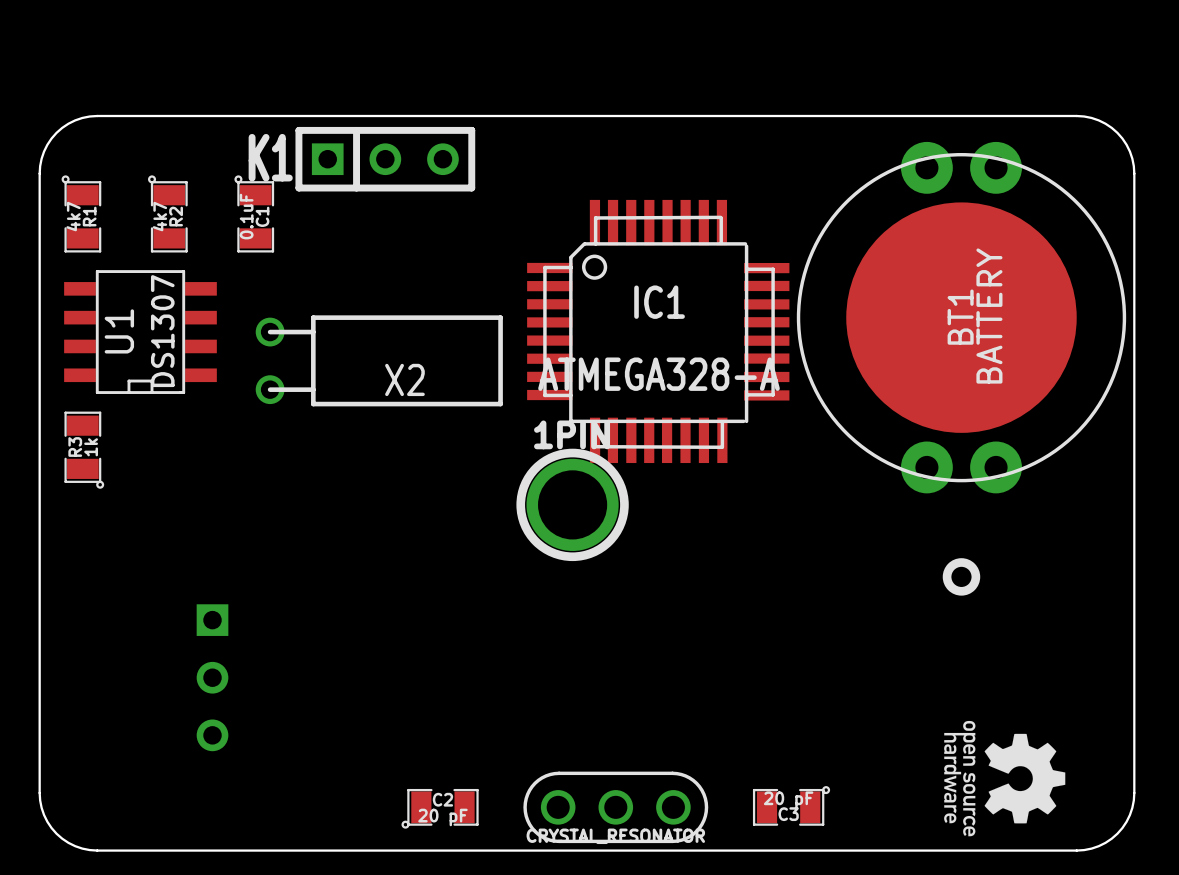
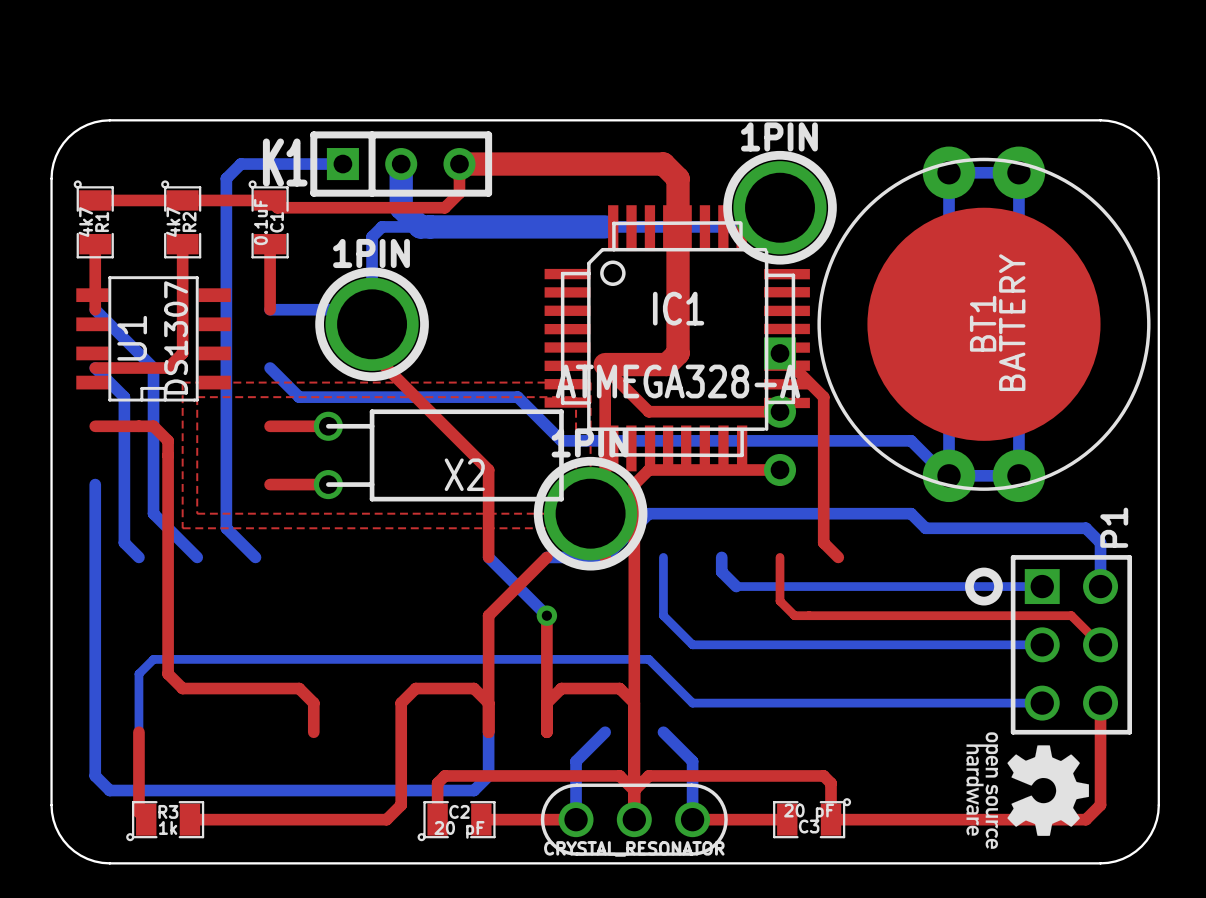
bottom track: none -> (342, 164) (240, 164) (226, 178) (226, 528) (255, 557)
bottom track: none -> (401, 164) (401, 207) (420, 226) (760, 226) (780, 207)
top track: none -> (95, 200) (270, 200) (277, 207) (444, 207) (459, 193) (459, 164) (663, 164) (678, 178) (678, 353) (666, 364) (605, 364) (605, 557)
1PIN: none -> (780, 207)
bottom track: none -> (430, 226) (382, 226) (372, 236) (372, 324) (357, 309) (270, 309)
top track: none -> (95, 244) (95, 309)
top track: none -> (182, 244) (182, 353) (168, 368) (95, 368)
top track: none -> (270, 244) (270, 309)
bottom track: none -> (95, 309) (153, 368) (153, 513) (197, 557)
top track: none -> (372, 324) (372, 353) (488, 469) (488, 557)
1PIN: none -> (372, 324)
top track: none -> (780, 353) (823, 397) (823, 542) (838, 557)
bottom track: none -> (95, 368) (124, 397) (124, 542) (138, 557)
bottom track: none -> (270, 368) (299, 397) (517, 397) (561, 440) (911, 440) (946, 475) (1018, 475) (1018, 172) (949, 172) (949, 475)
X2 position: (379, 360) -> (438, 455)
top track: none -> (605, 368) (648, 411) (780, 411)
top zone outline: none -> (182, 382) (590, 382) (590, 528) (182, 528) (182, 382)
top zone outline: none -> (197, 397) (197, 513) (576, 513) (576, 397) (197, 397)
part: none -> (780, 411)
top track: none -> (95, 426) (153, 426) (168, 440) (168, 673) (182, 688) (299, 688) (313, 703) (313, 732)
top track: none -> (270, 426) (328, 426)
R3 rotation: 0° (84, 450) -> 90° clockwise (165, 821)
R3 position: (84, 450) -> (165, 821)
top track: none -> (780, 469) (648, 469) (634, 484) (634, 819)
bottom track: none -> (95, 484) (95, 775) (109, 790) (474, 790) (488, 775) (488, 732)
top track: none -> (270, 484) (328, 484)
bottom track: none -> (488, 557) (546, 615)
bottom track: none -> (546, 557) (605, 557) (648, 513) (911, 513) (925, 528) (1085, 528) (1100, 542) (1100, 586)
top track: none -> (546, 557) (488, 615) (488, 732)
bottom track: none -> (663, 557) (663, 615) (692, 644) (1042, 644)
bottom track: none -> (721, 557) (721, 571) (736, 586) (1042, 586)
top track: none -> (780, 557) (780, 601) (794, 615) (1071, 615) (1100, 644)
top track: none -> (546, 615) (546, 732)
via: none -> (546, 615)
P1: none -> (1071, 644)
part: (212, 677) -> none
top track: none -> (488, 703) (474, 688) (415, 688) (401, 703) (401, 805) (386, 819) (189, 819)
top track: none -> (546, 703) (561, 688) (619, 688) (634, 703)
bottom track: none -> (1042, 703) (692, 703) (648, 659) (153, 659) (138, 673) (138, 732)
top track: none -> (1100, 703) (1100, 805) (1085, 819) (831, 819) (831, 783) (823, 775) (648, 775) (634, 790) (619, 775) (444, 775) (437, 783) (437, 819)
top track: none -> (138, 732) (138, 812) (146, 819)
bottom track: none -> (605, 732) (576, 761) (576, 819)
bottom track: none -> (663, 732) (692, 761) (692, 819)
top track: none -> (481, 819) (576, 819)
top track: none -> (692, 819) (787, 819)

